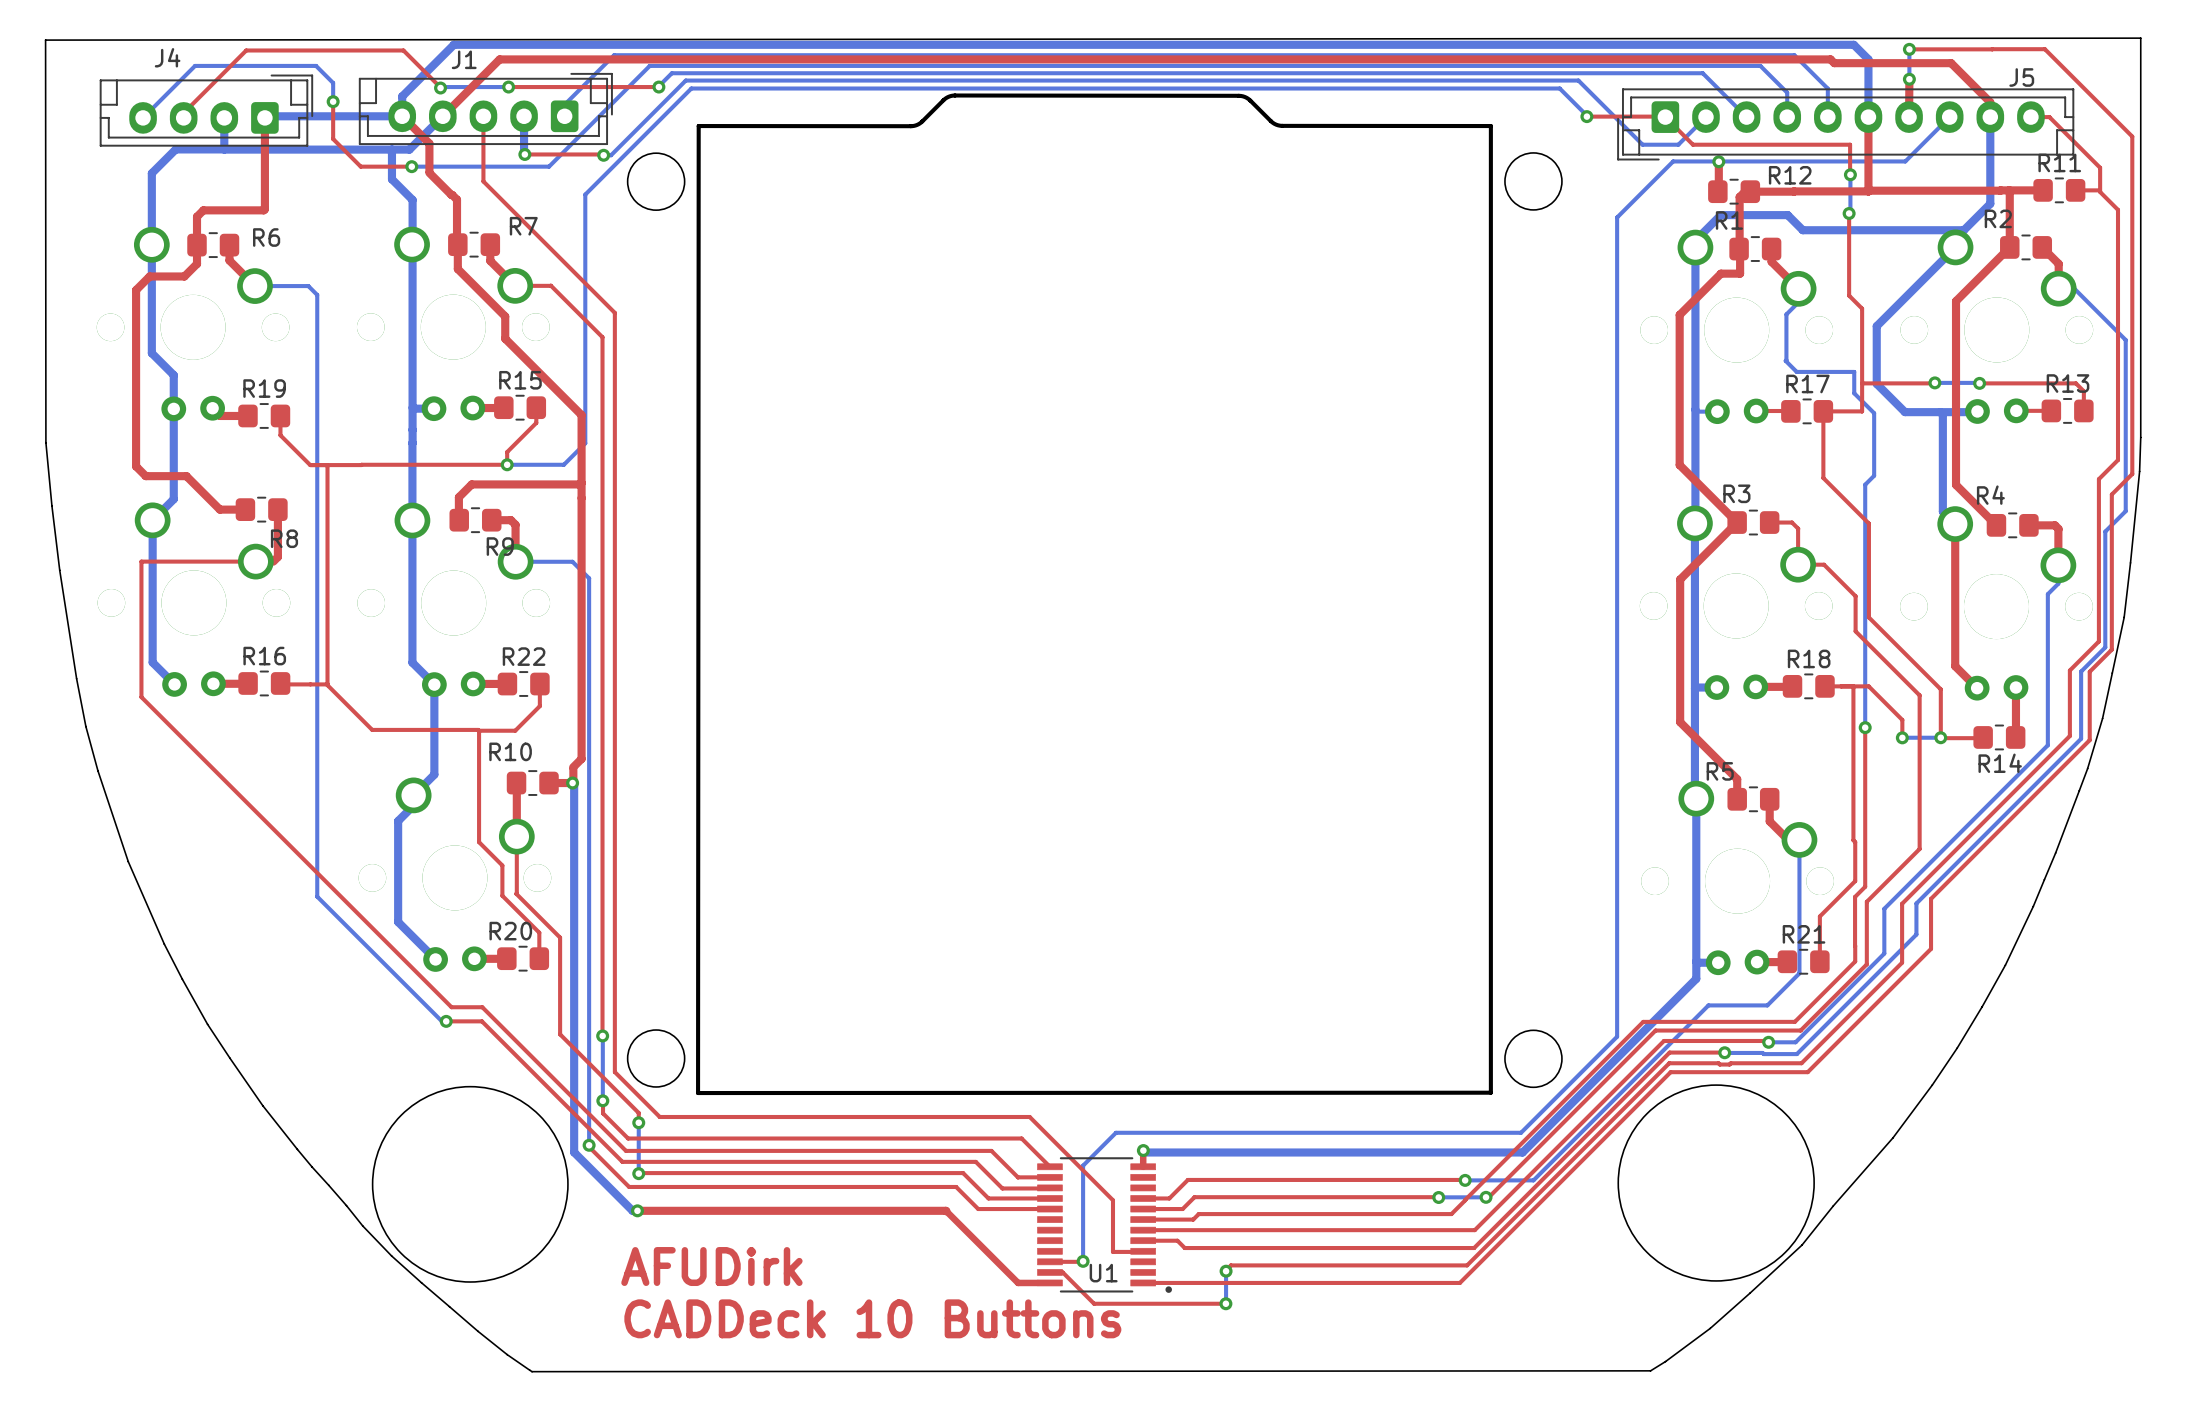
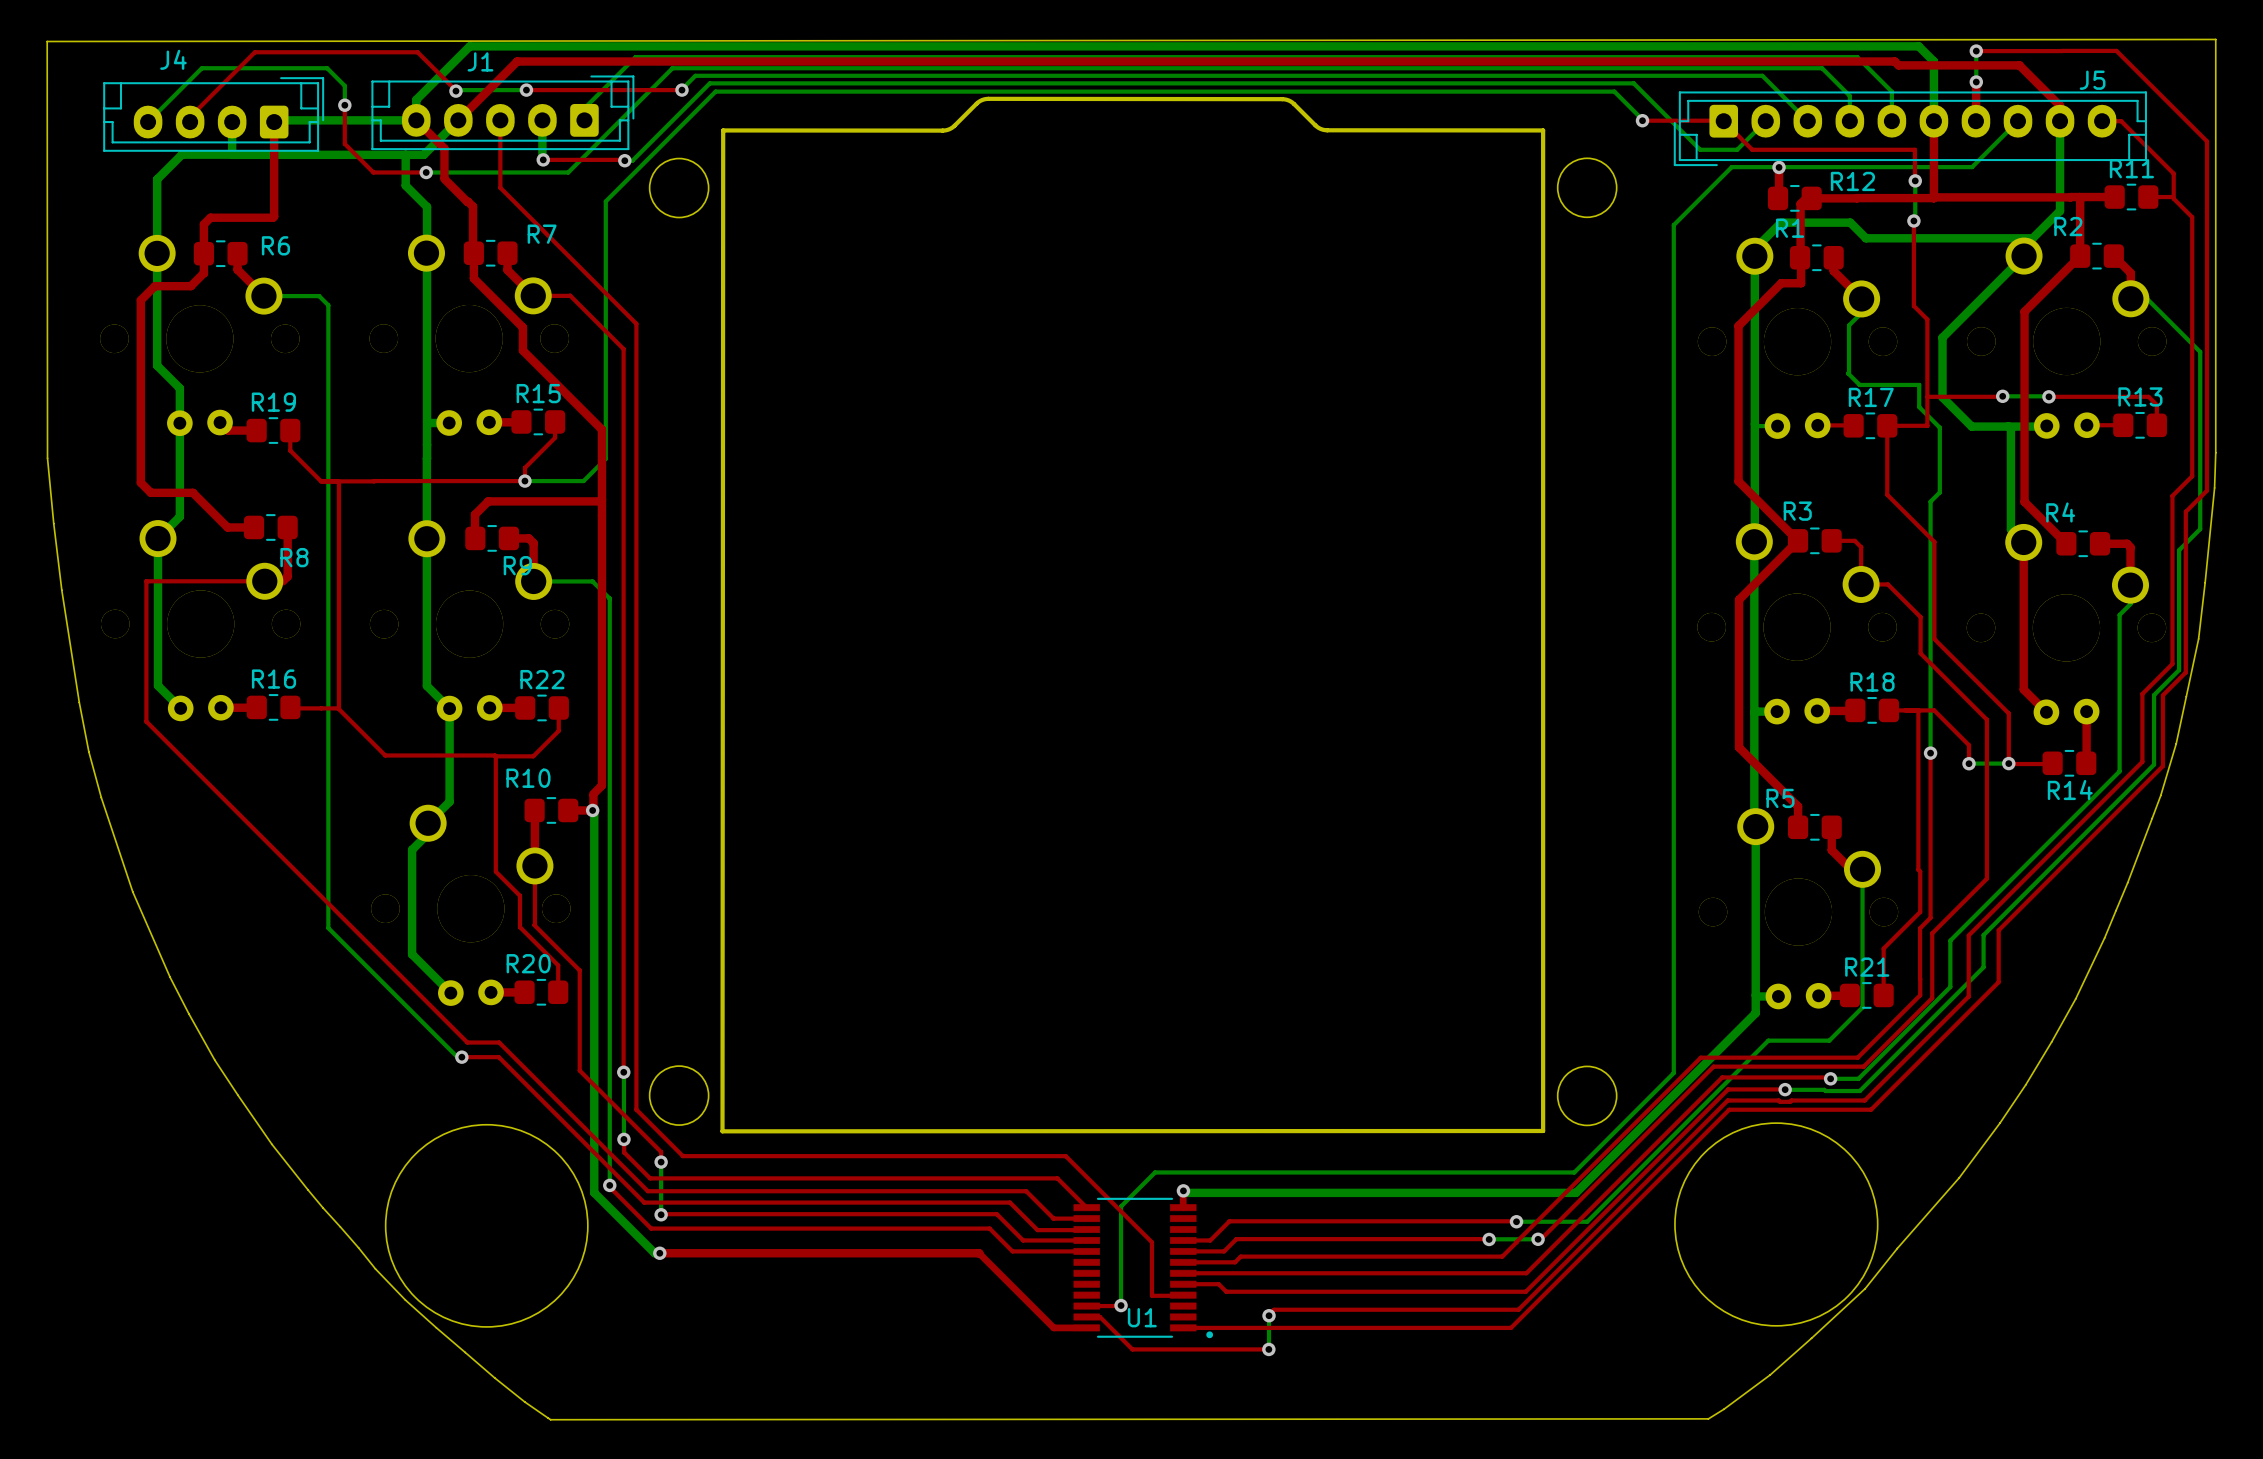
text: AFUDirk (711, 1266) -> none
text: CADDeck 10 Buttons (872, 1318) -> none

